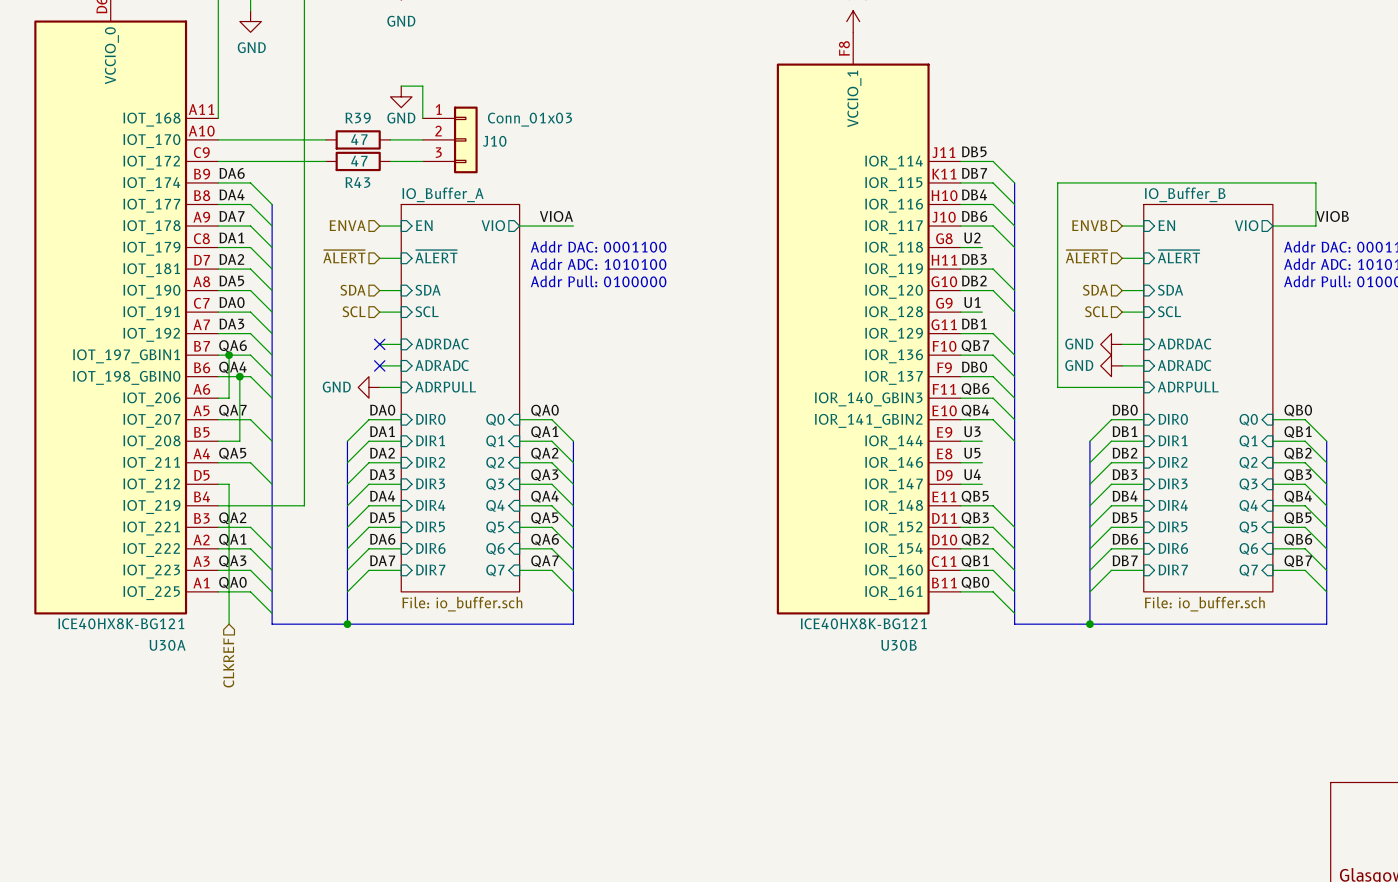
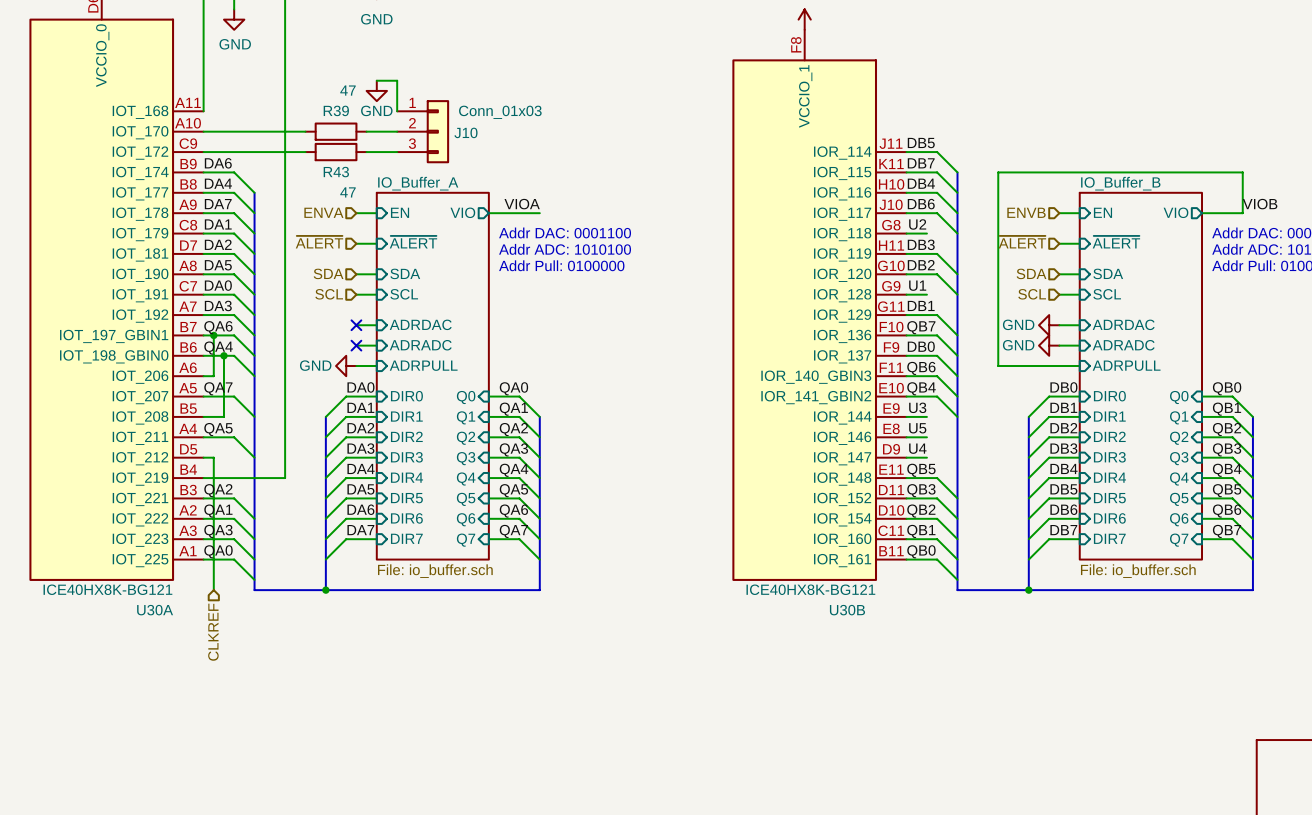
R39 value position: 47 (359, 139) -> 47 (347, 90)
R43 value position: 47 (359, 161) -> 47 (347, 192)

